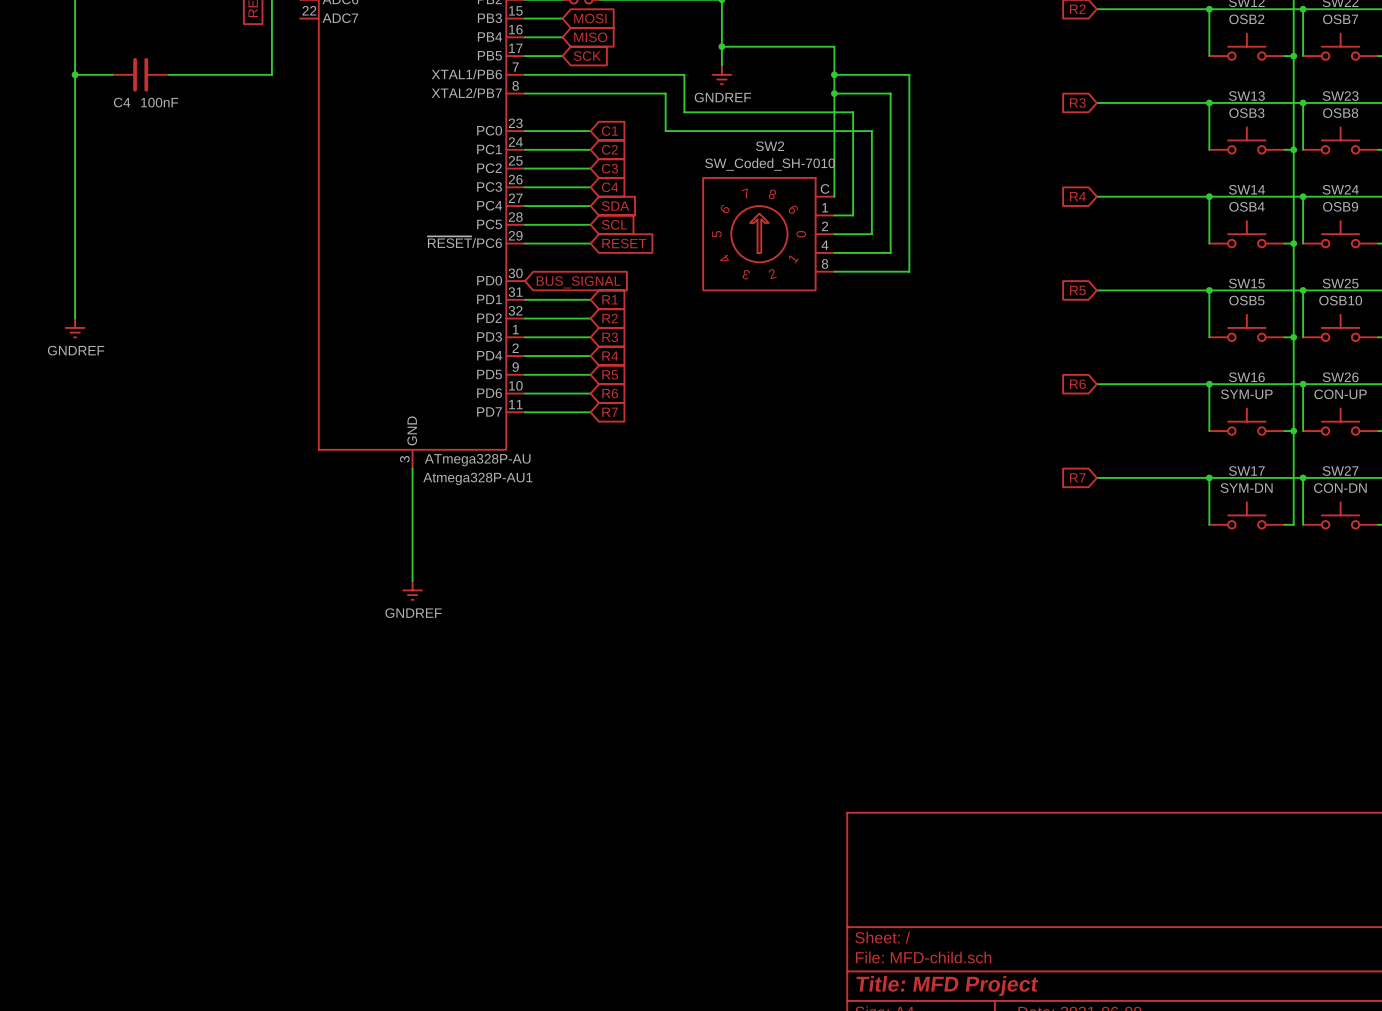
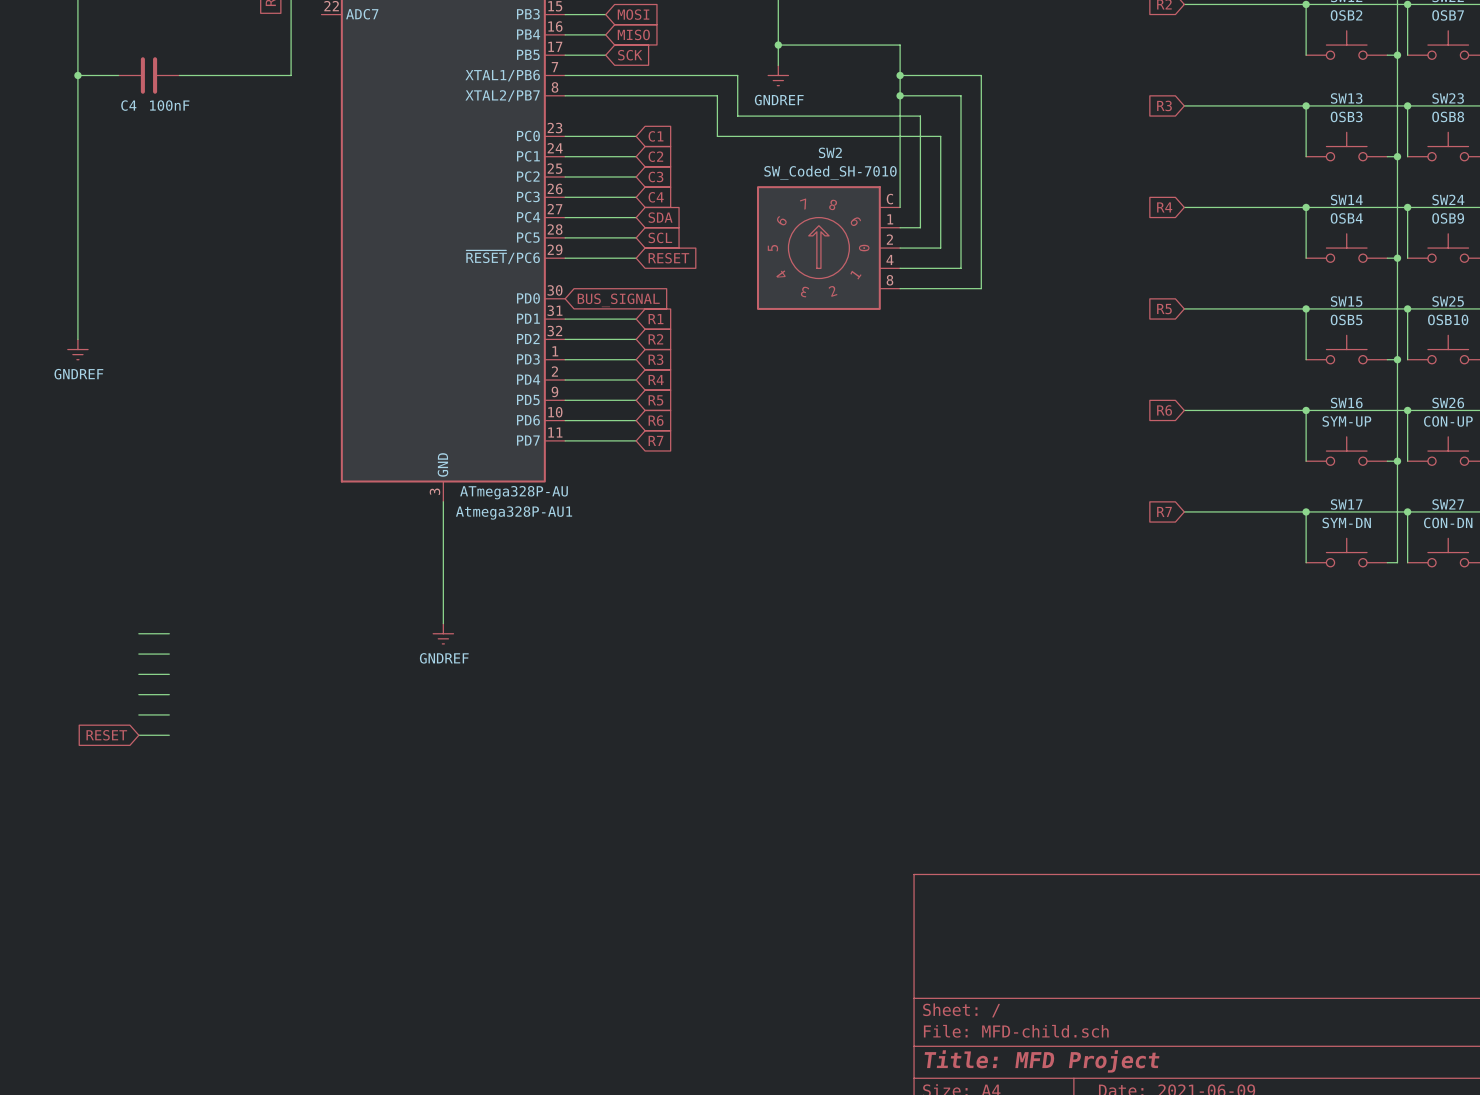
wire: none -> (138, 633) (169, 633)
wire: none -> (138, 654) (169, 654)
wire: none -> (138, 674) (169, 674)
wire: none -> (138, 694) (169, 694)
wire: none -> (138, 714) (169, 714)
global label: none -> RESET (106, 735)
wire: none -> (138, 735) (169, 735)

